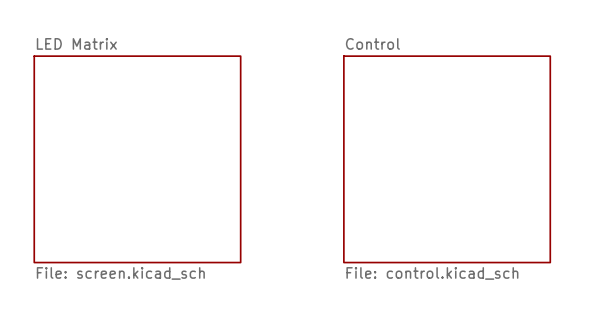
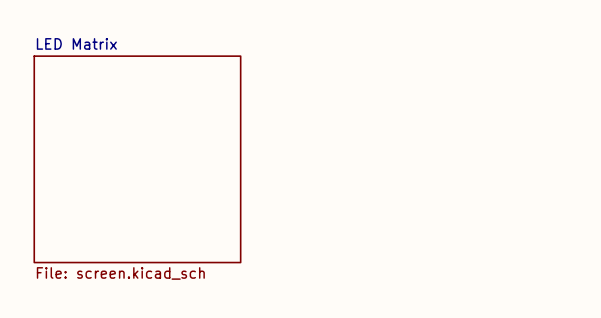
sheet Control: File: control.kicad_sch (447, 159) -> none

